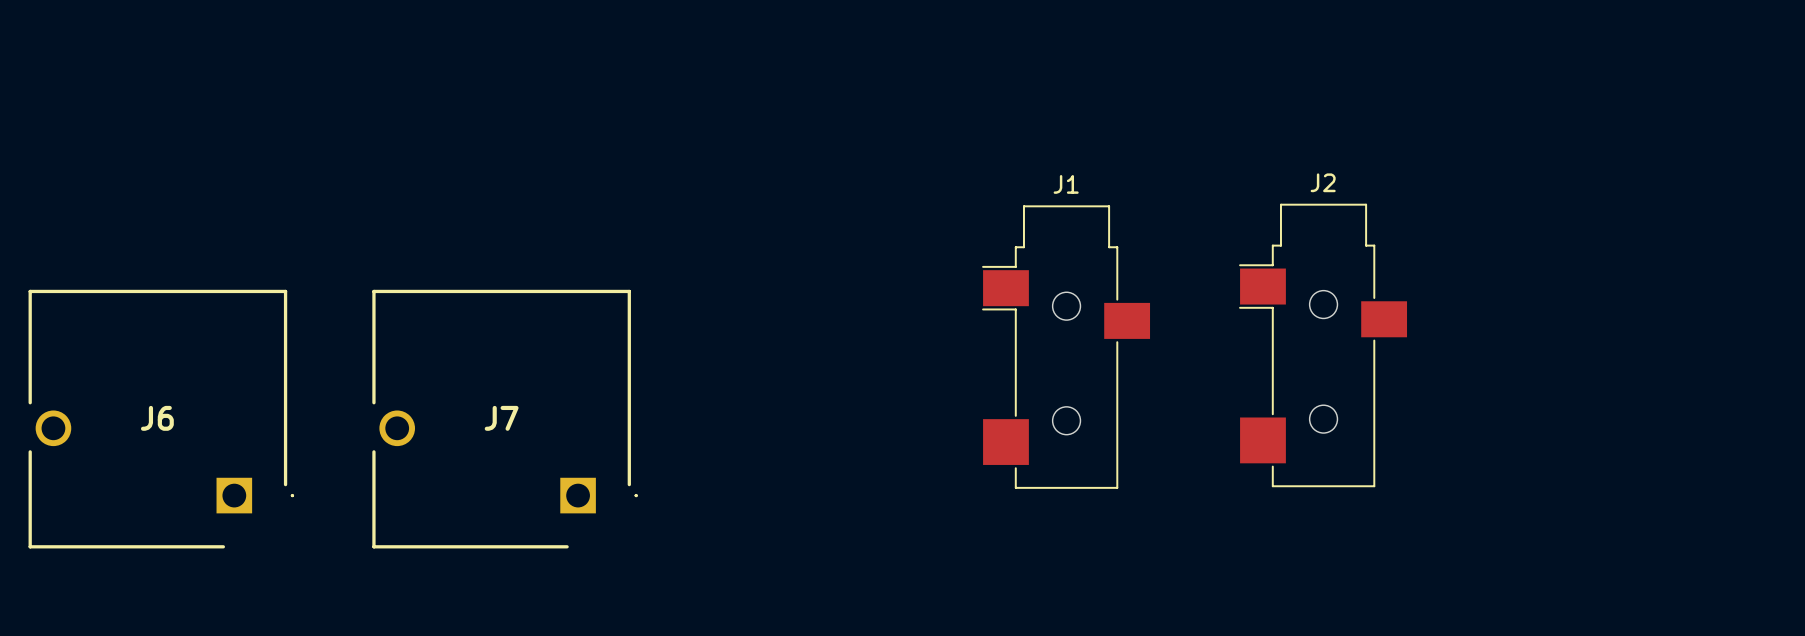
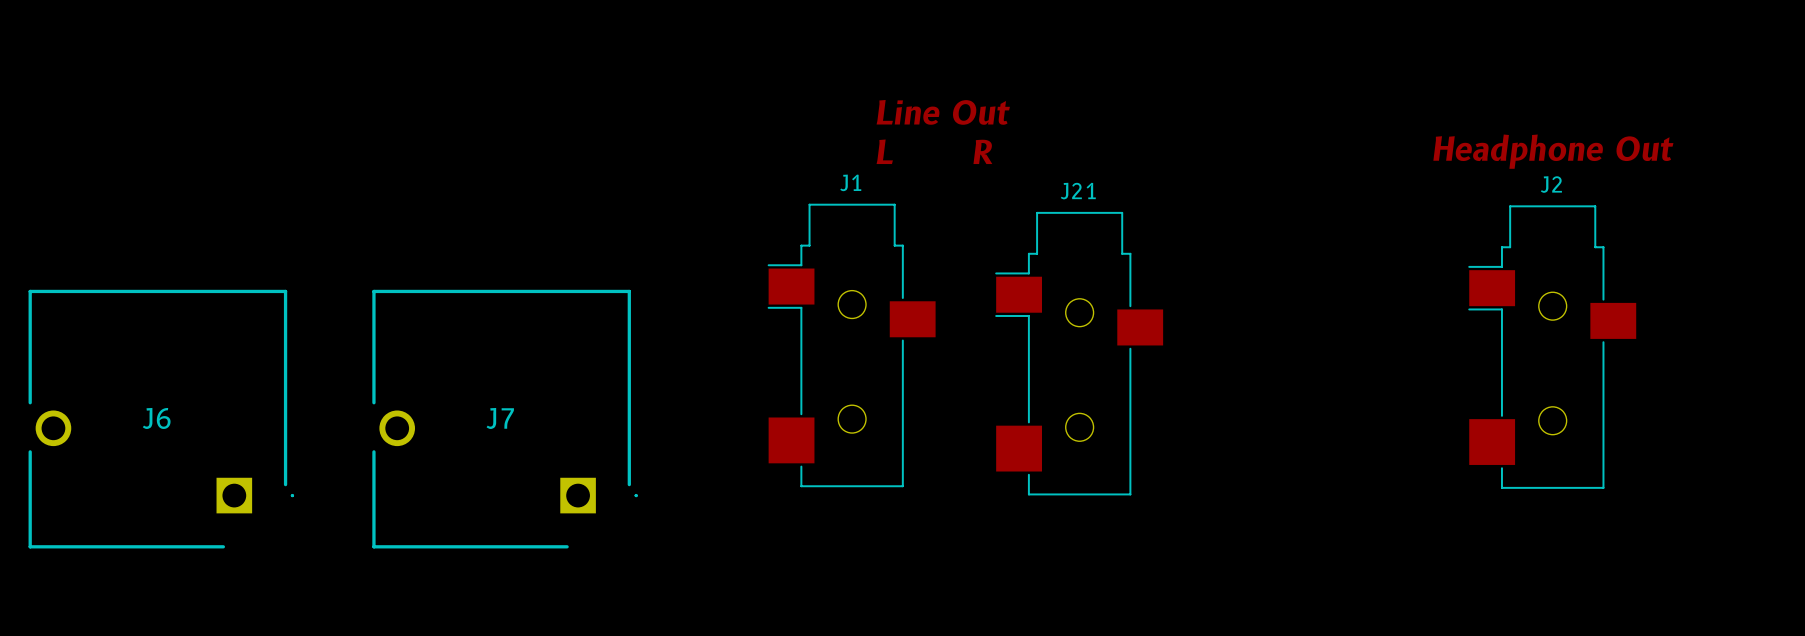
text: none -> Line Out (943, 112)
text: none -> L R (934, 151)
text: none -> Headphone Out (1553, 151)
J2 position: (1323, 345) -> (1552, 347)
J1 position: (1066, 347) -> (851, 345)
J21: none -> (1079, 353)

